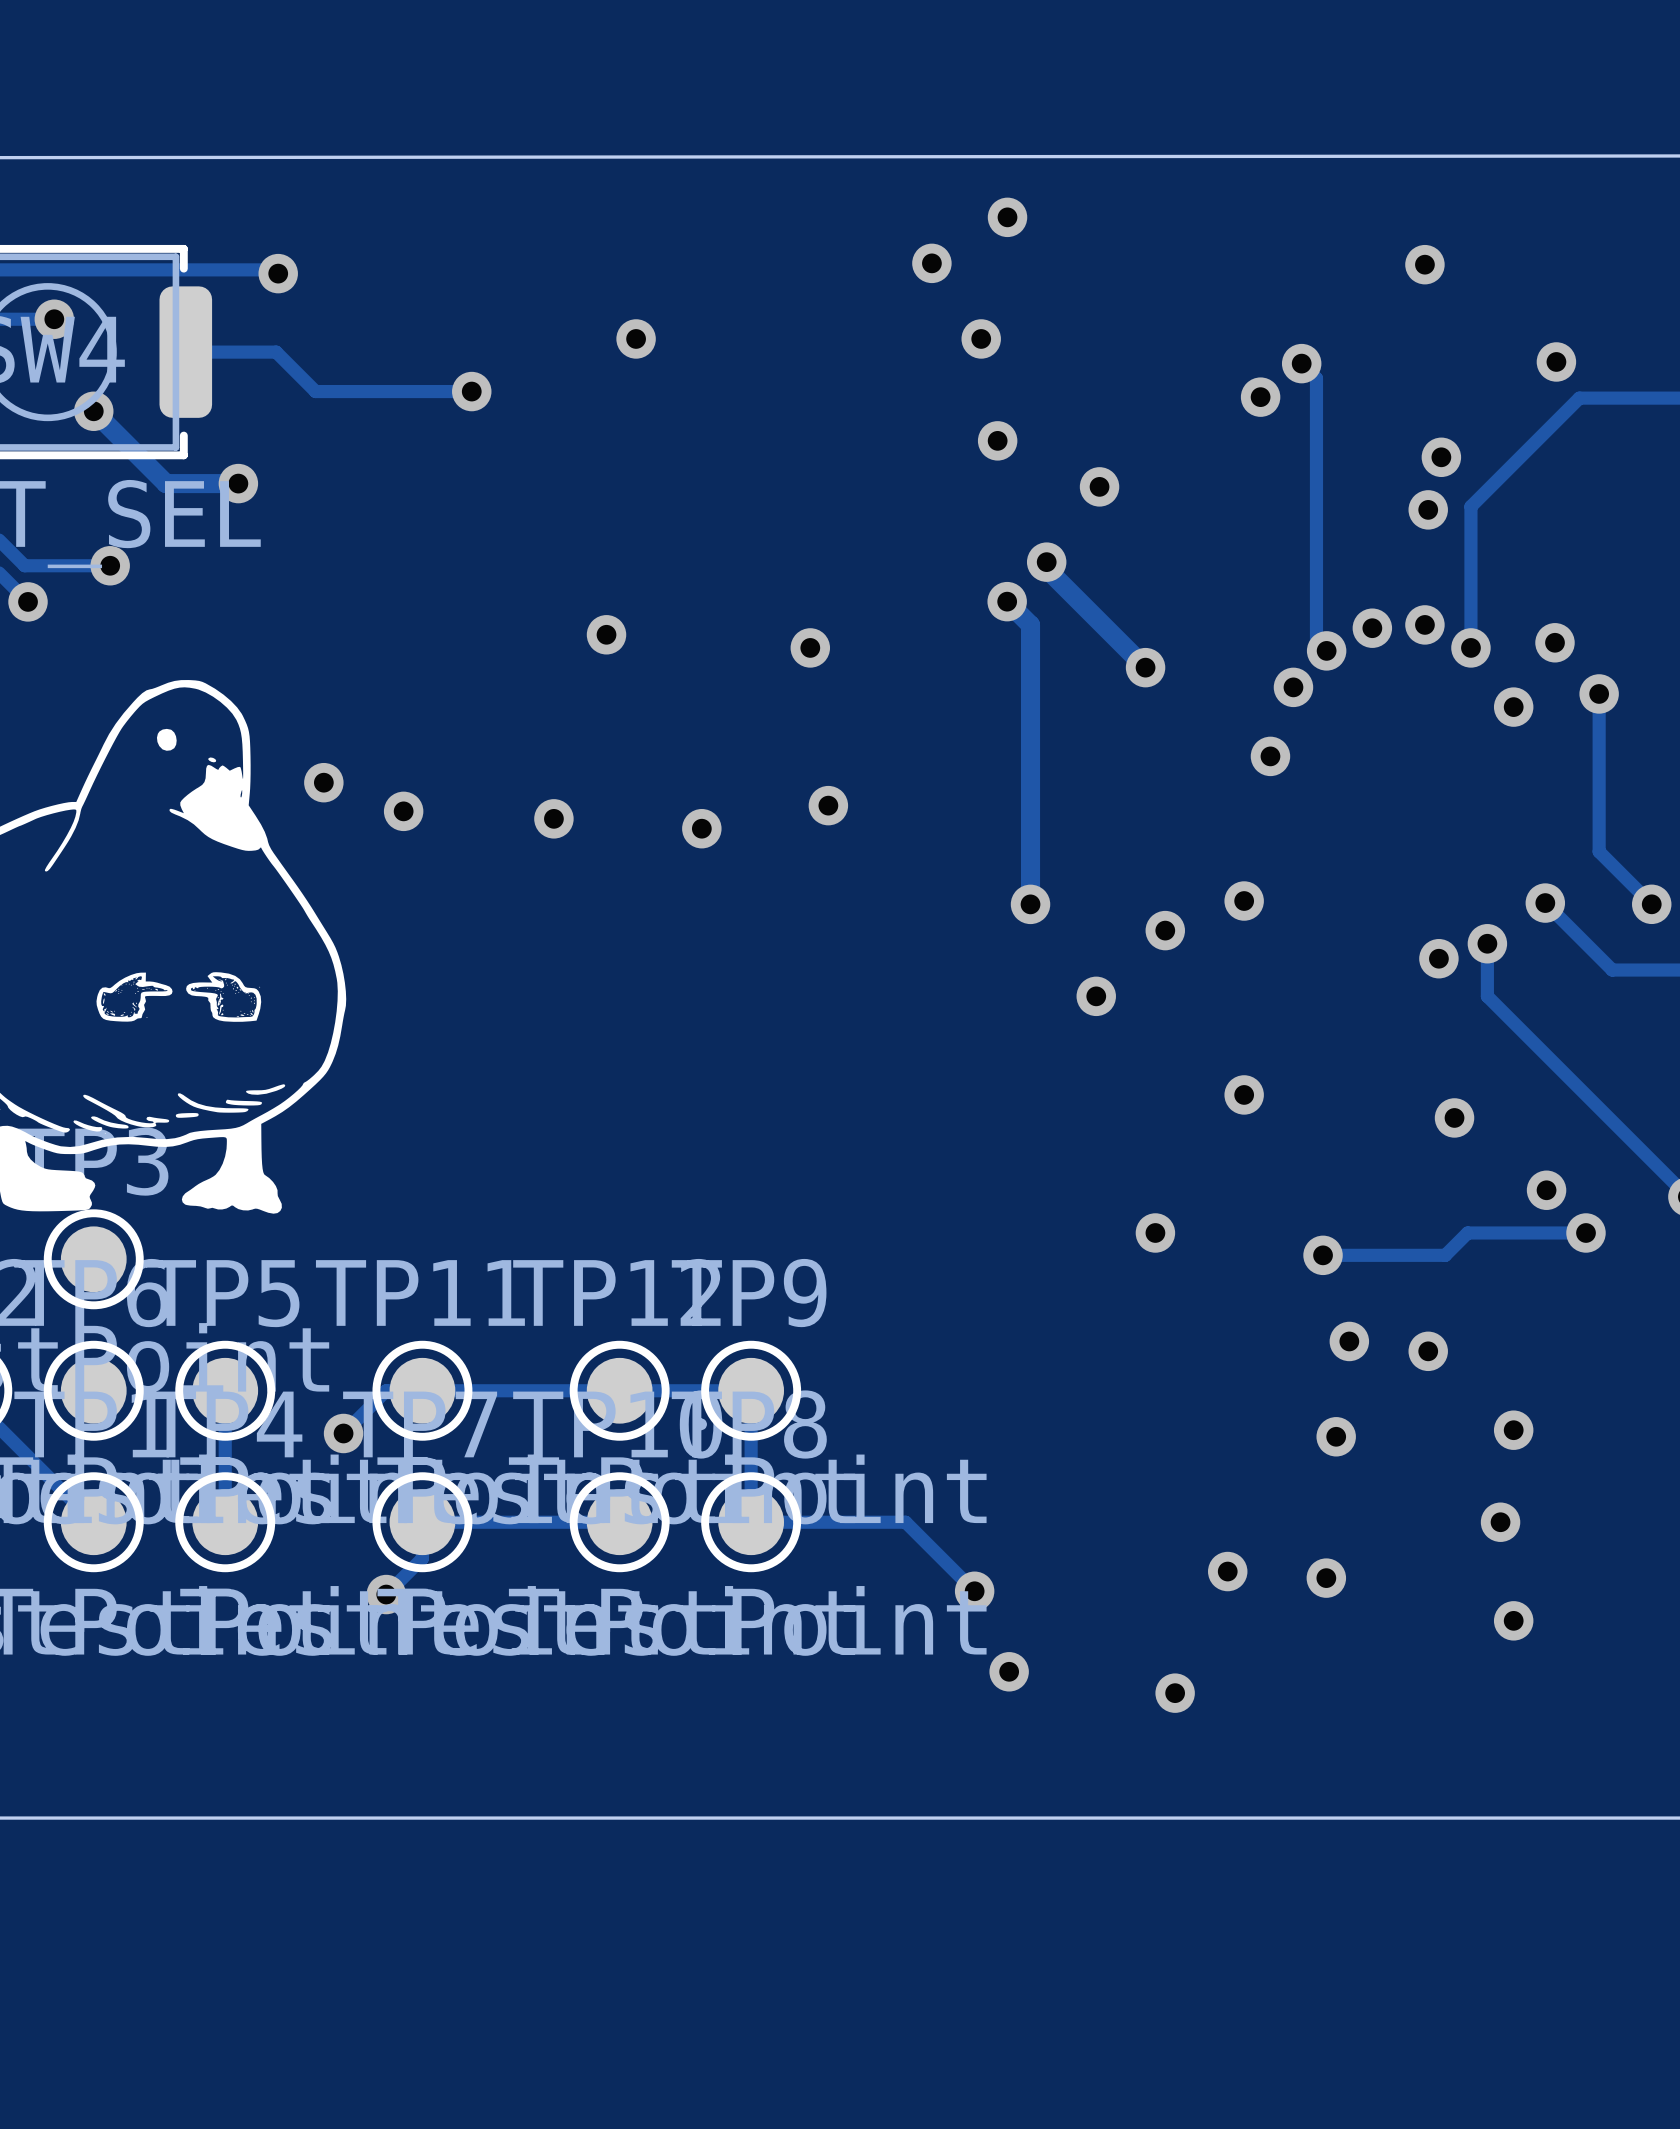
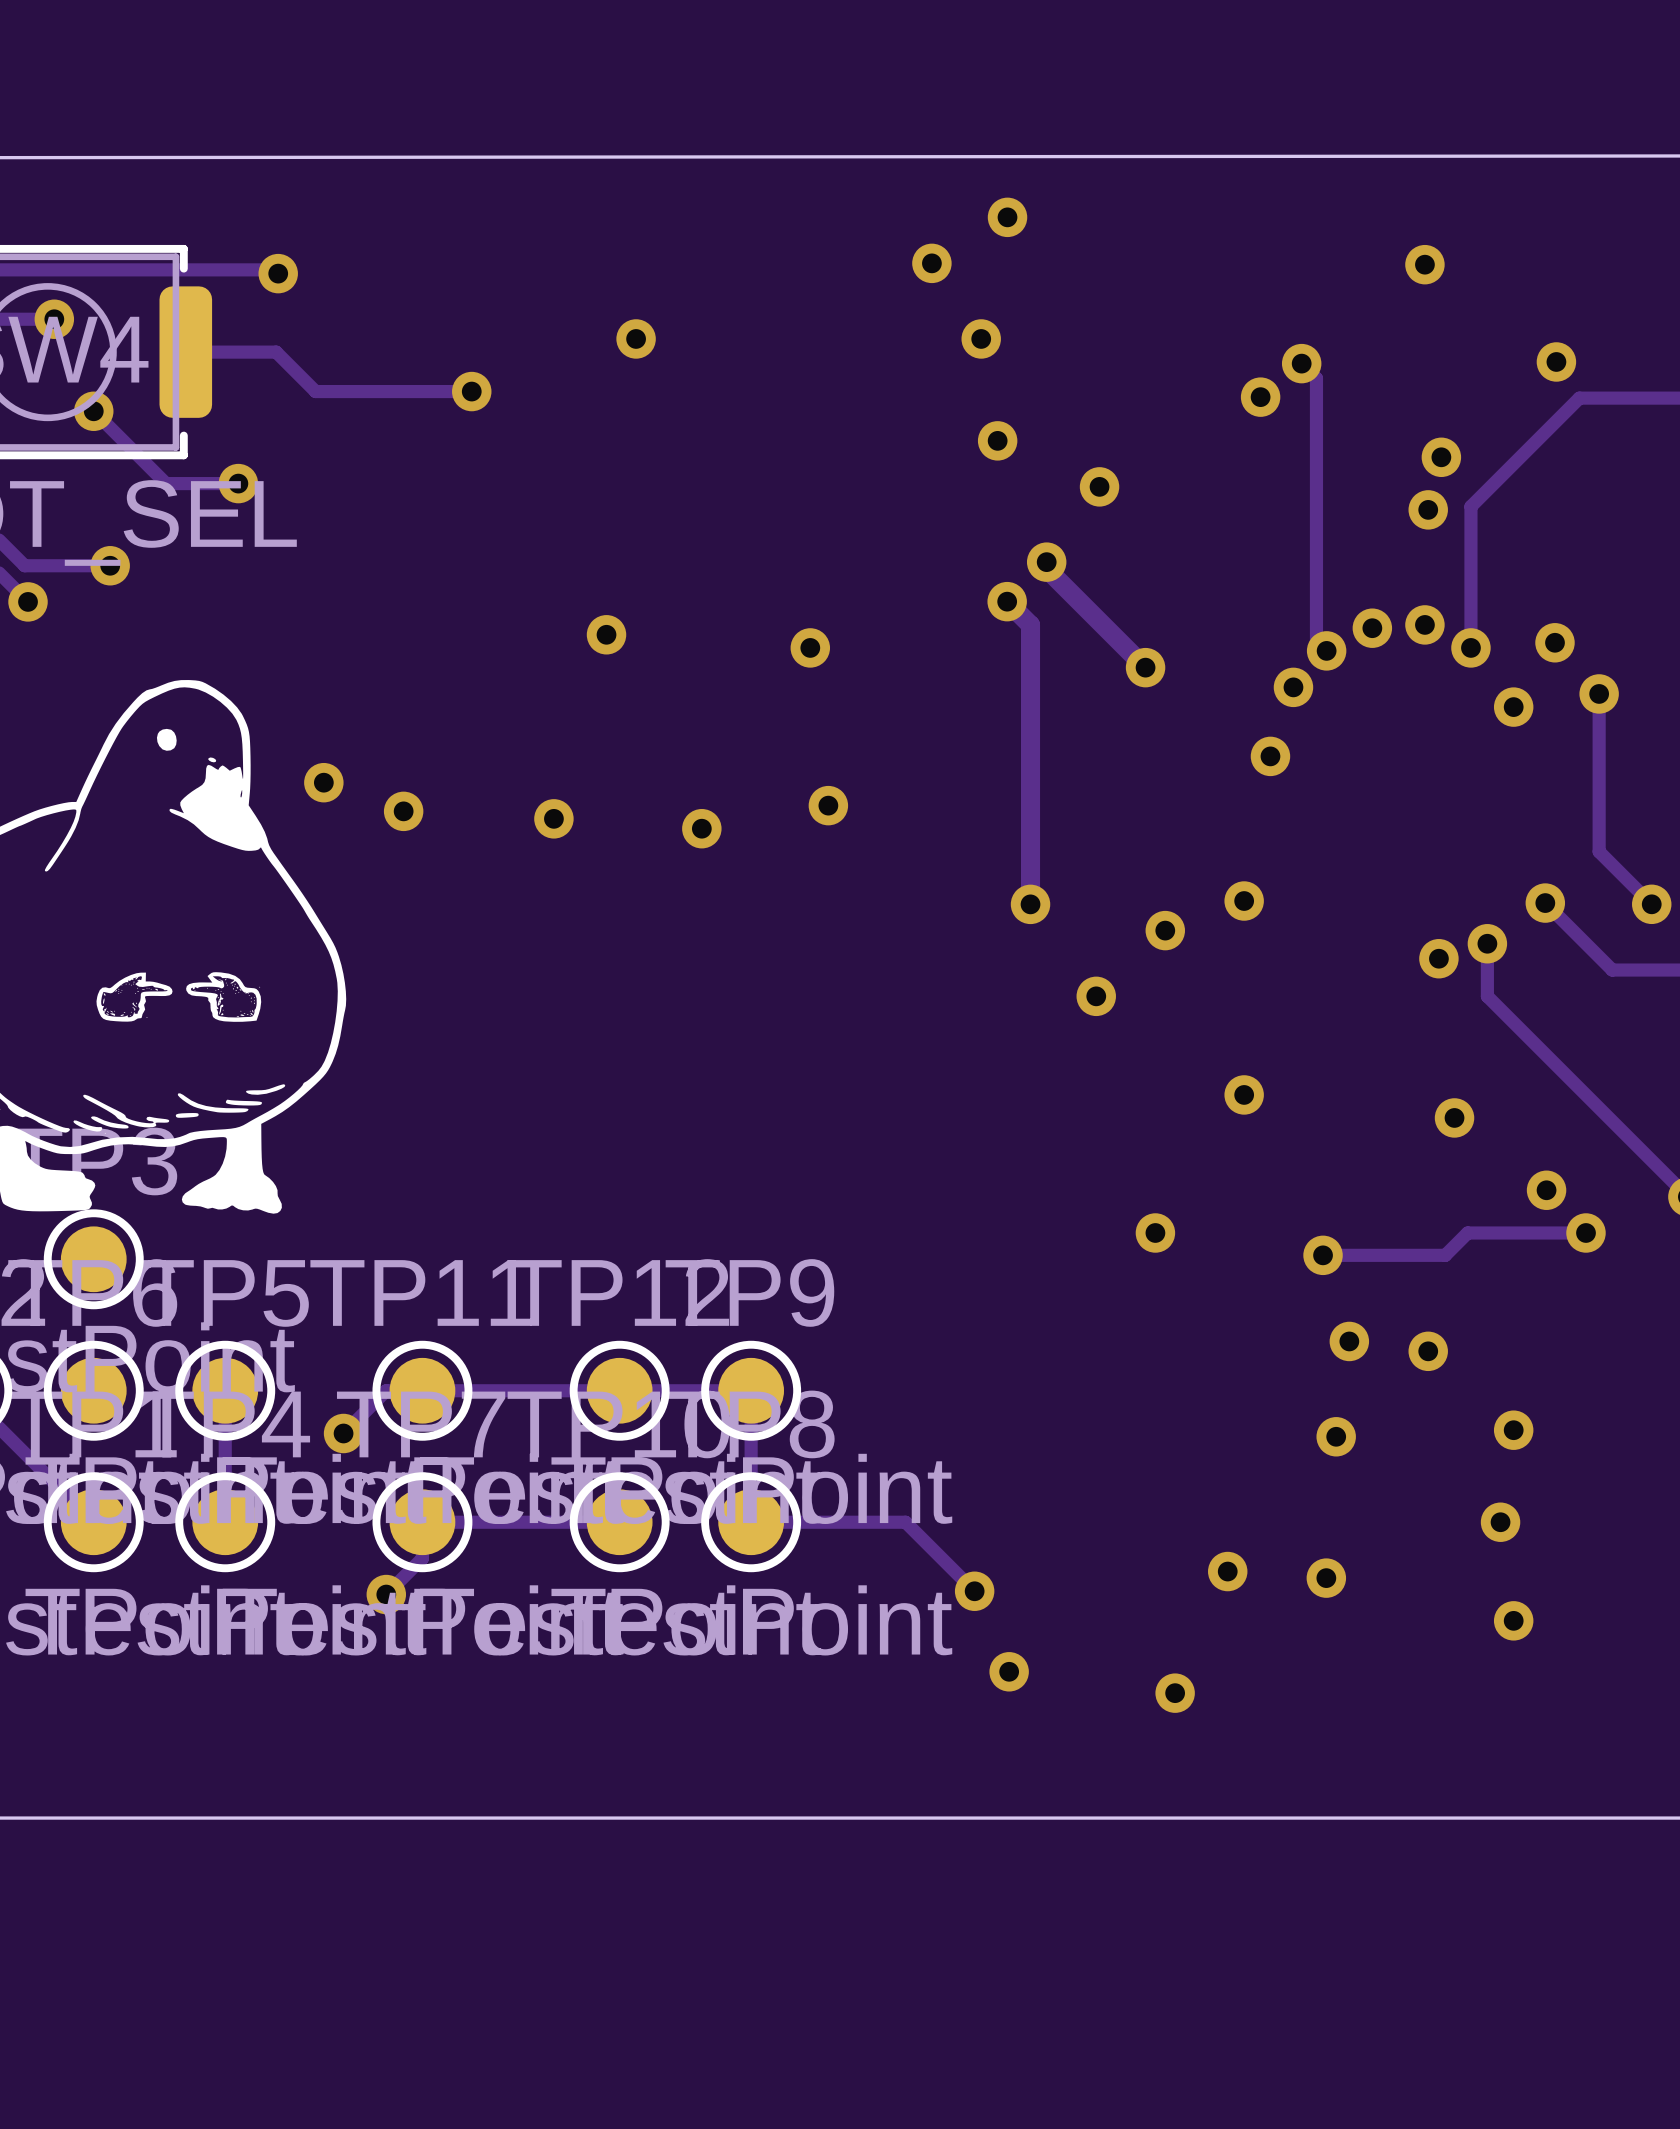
track width: thick (93, 411) (166, 483) (238, 483) -> thin (93, 411) (166, 483) (238, 483)

